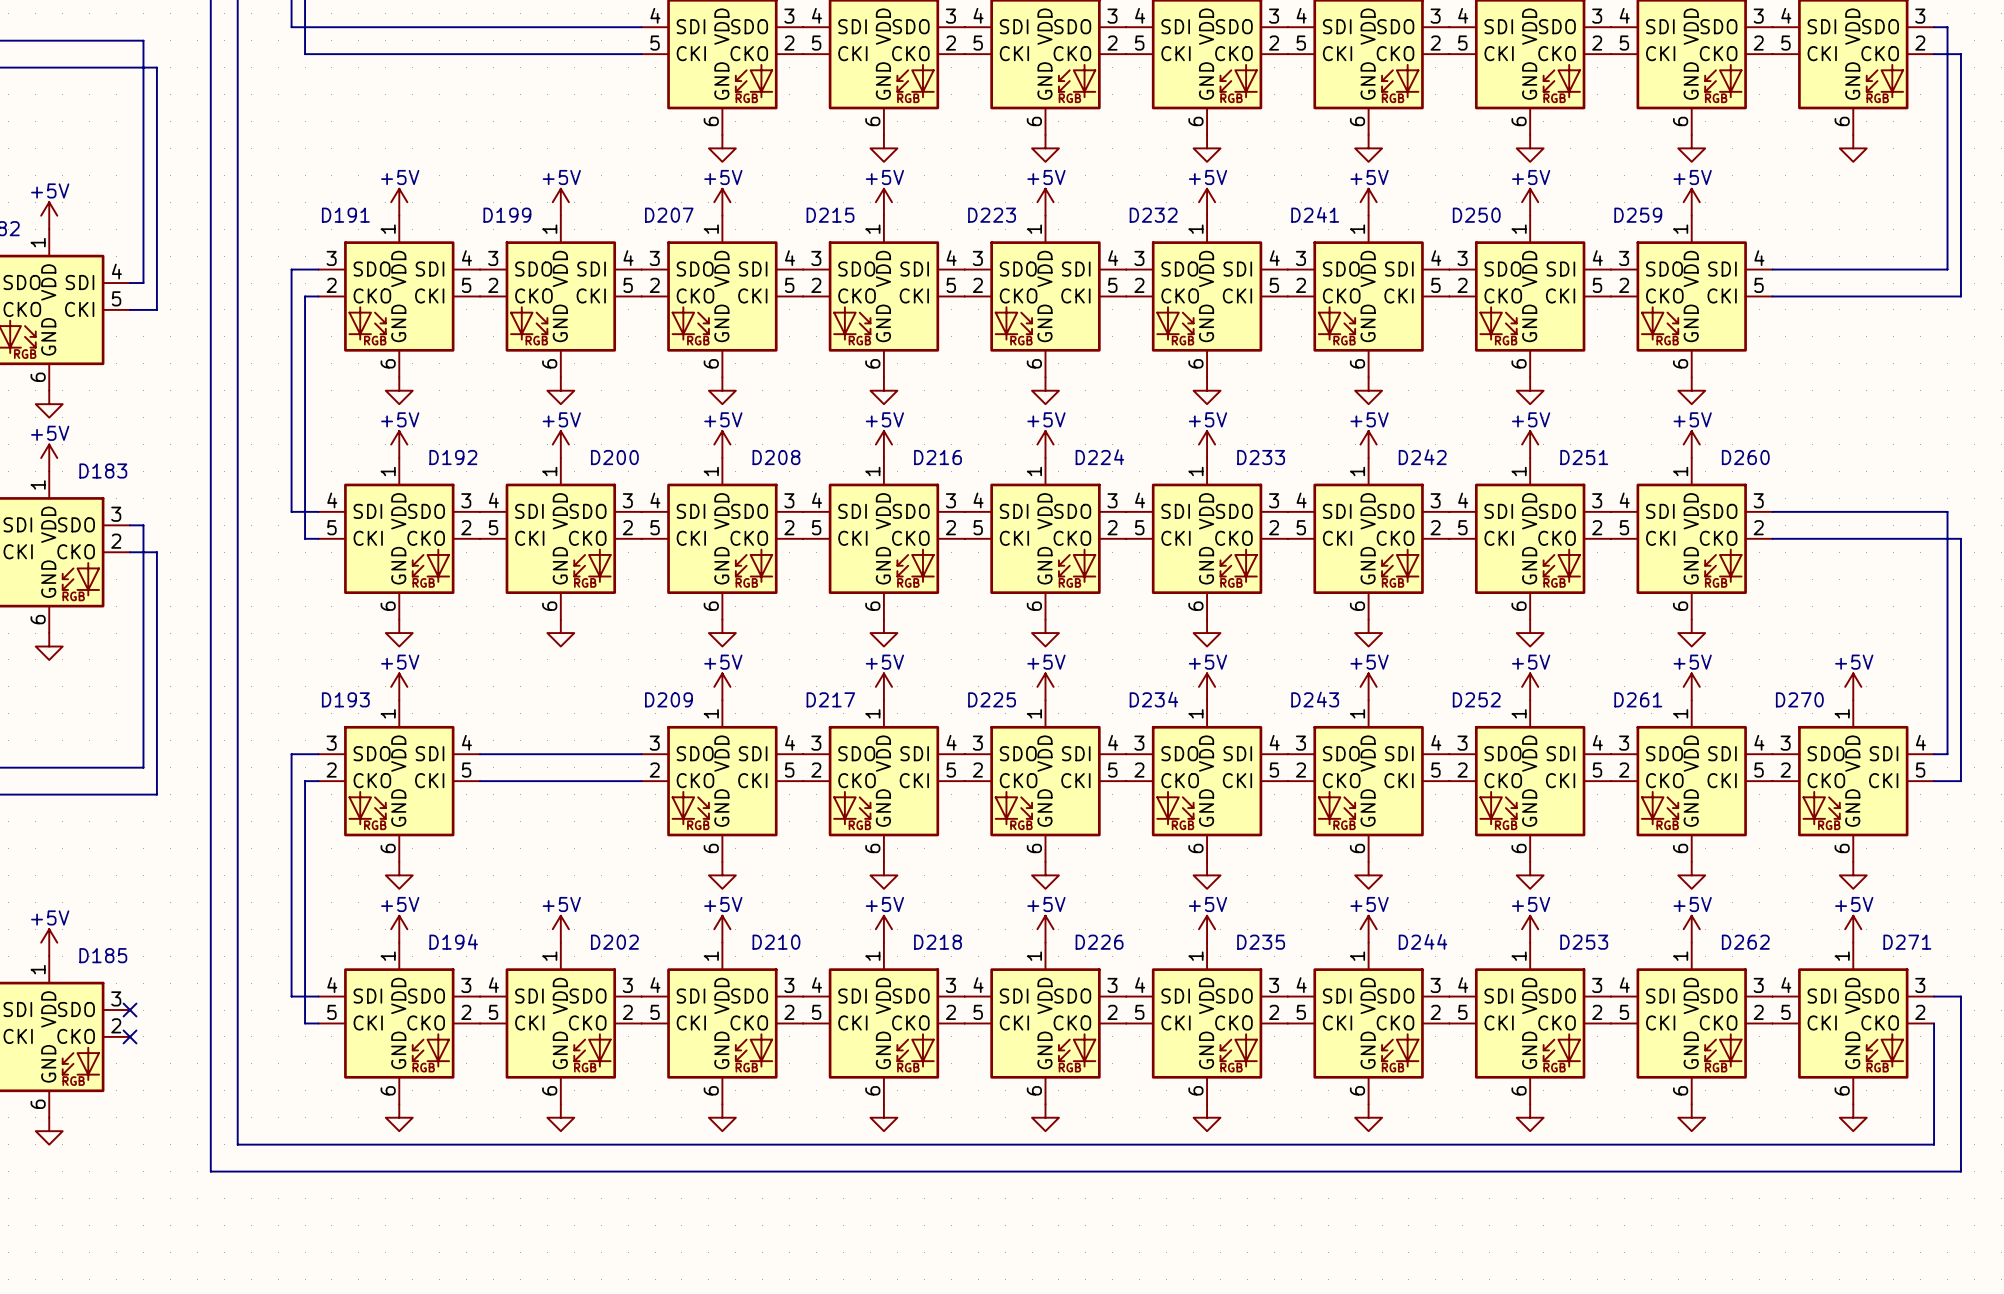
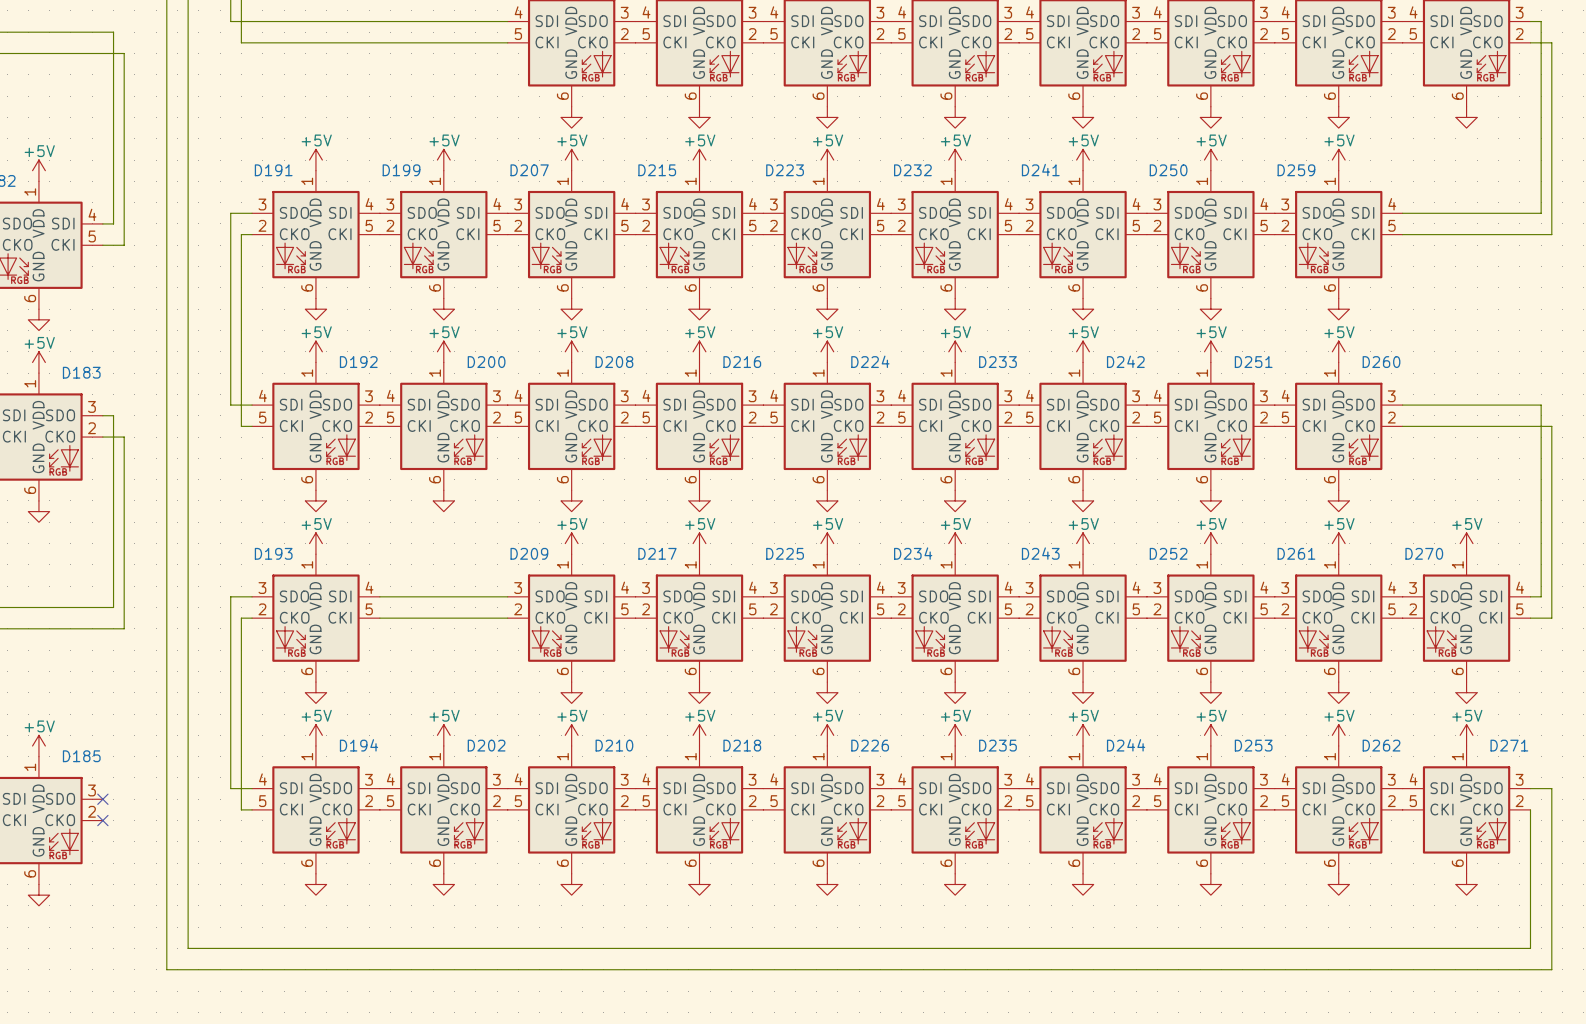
wire: (237, 1144) (1934, 1144) -> (188, 905) (188, 948) (1530, 948) (1530, 905)
wire: (210, 1171) (1960, 1171) -> (166, 927) (166, 969) (1551, 969) (1551, 927)

